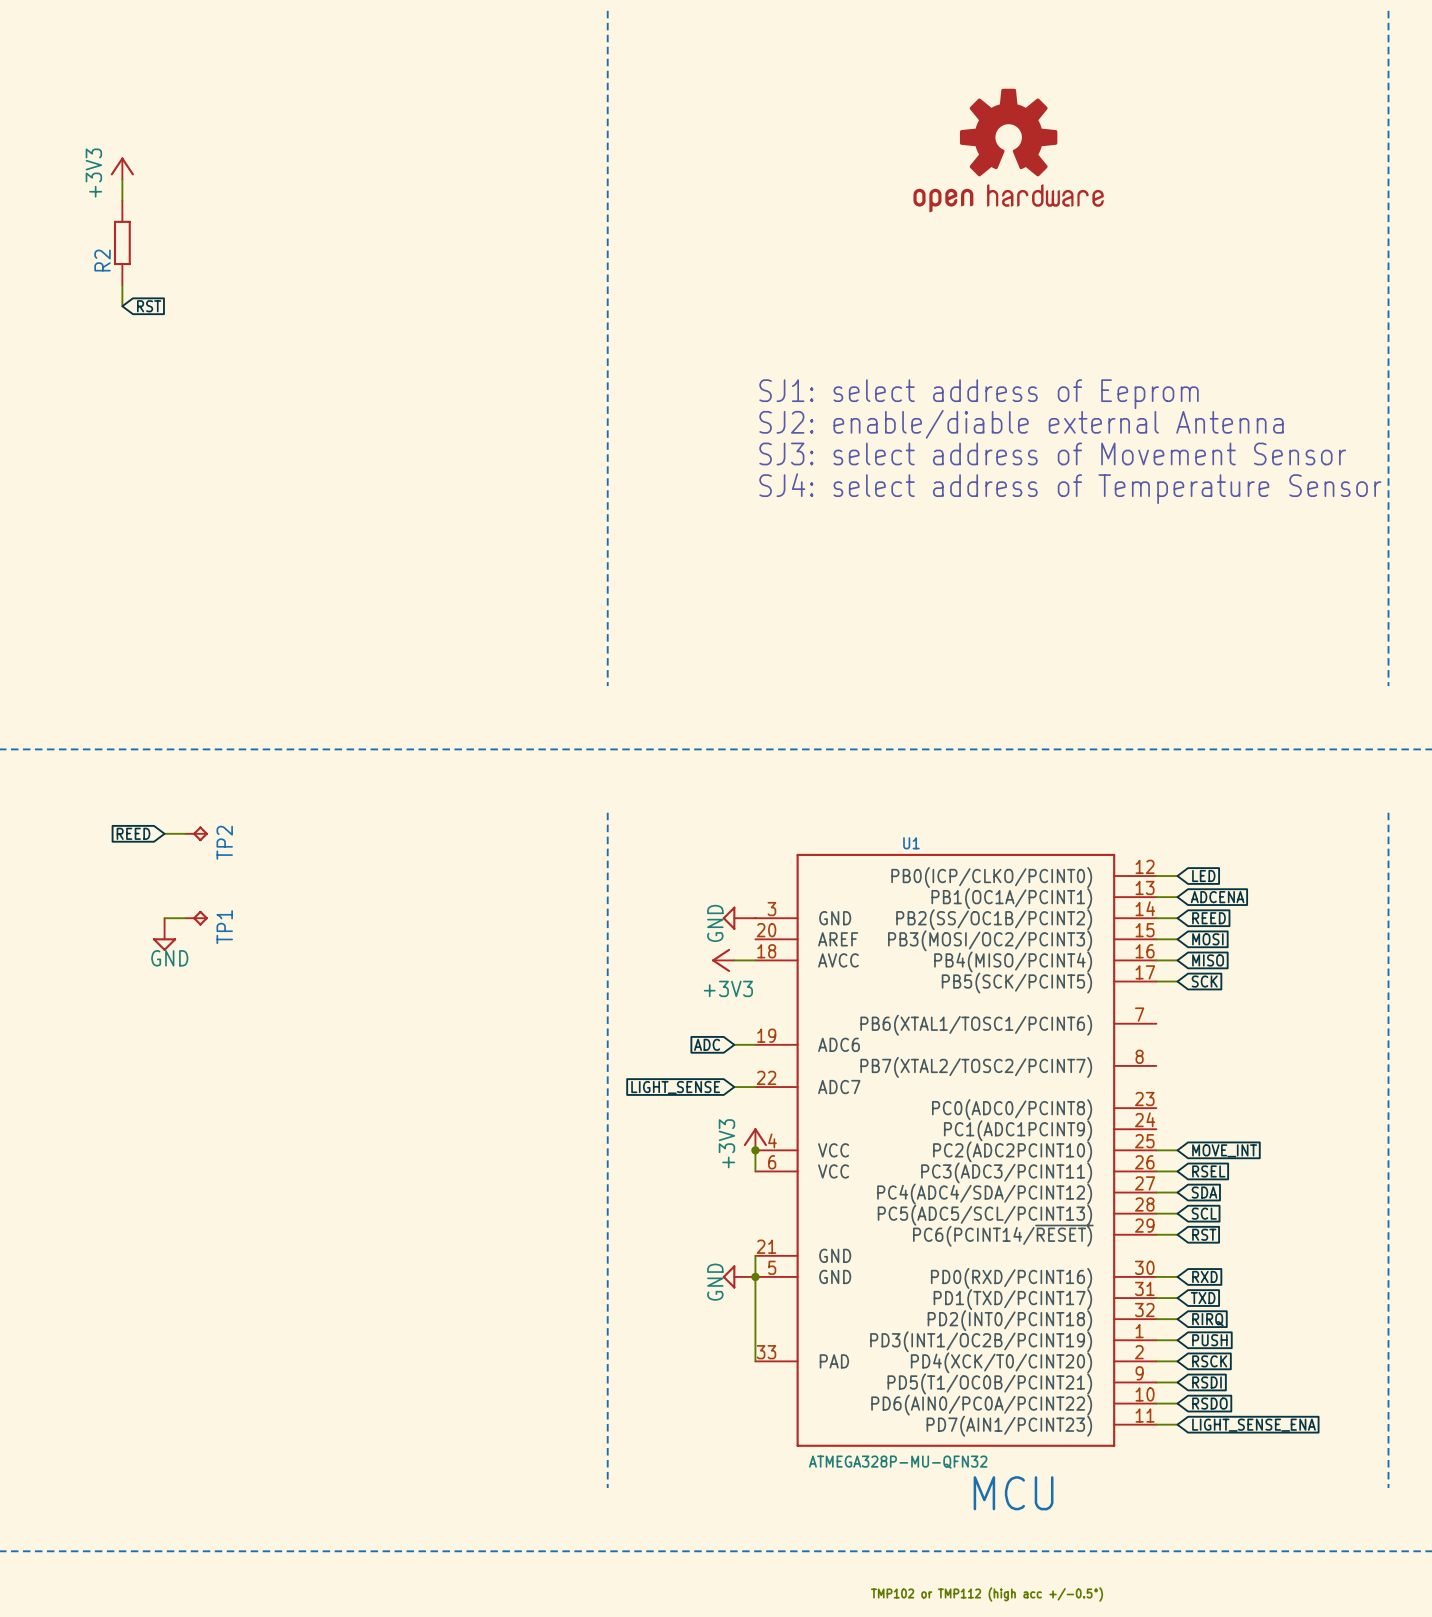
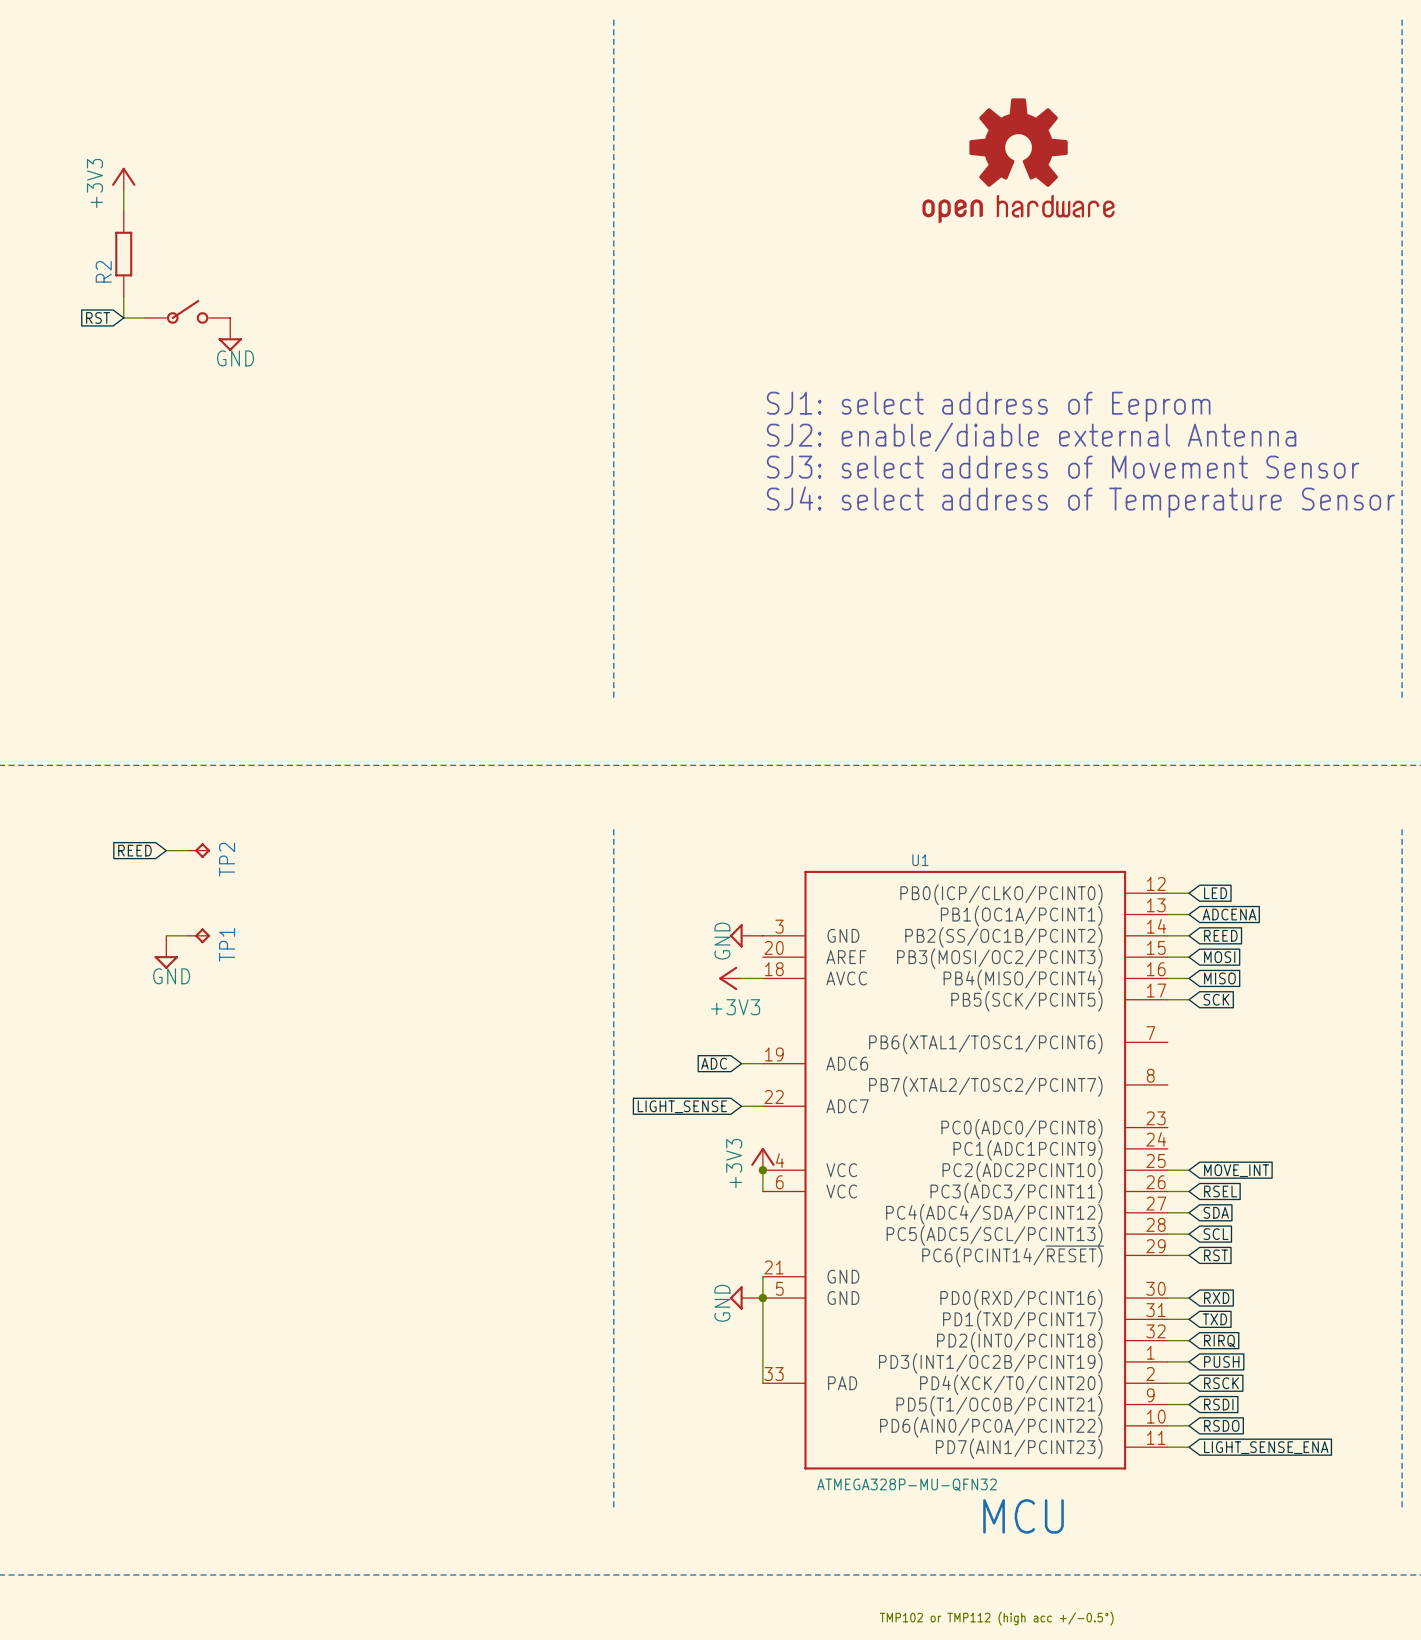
part: none -> (187, 311)
wire: none -> (123, 317) (145, 317)
global label rotation: 0° (149, 306) -> 180° (98, 317)
global label position: RST (149, 306) -> RST (98, 317)
power symbol: none -> GND (230, 334)

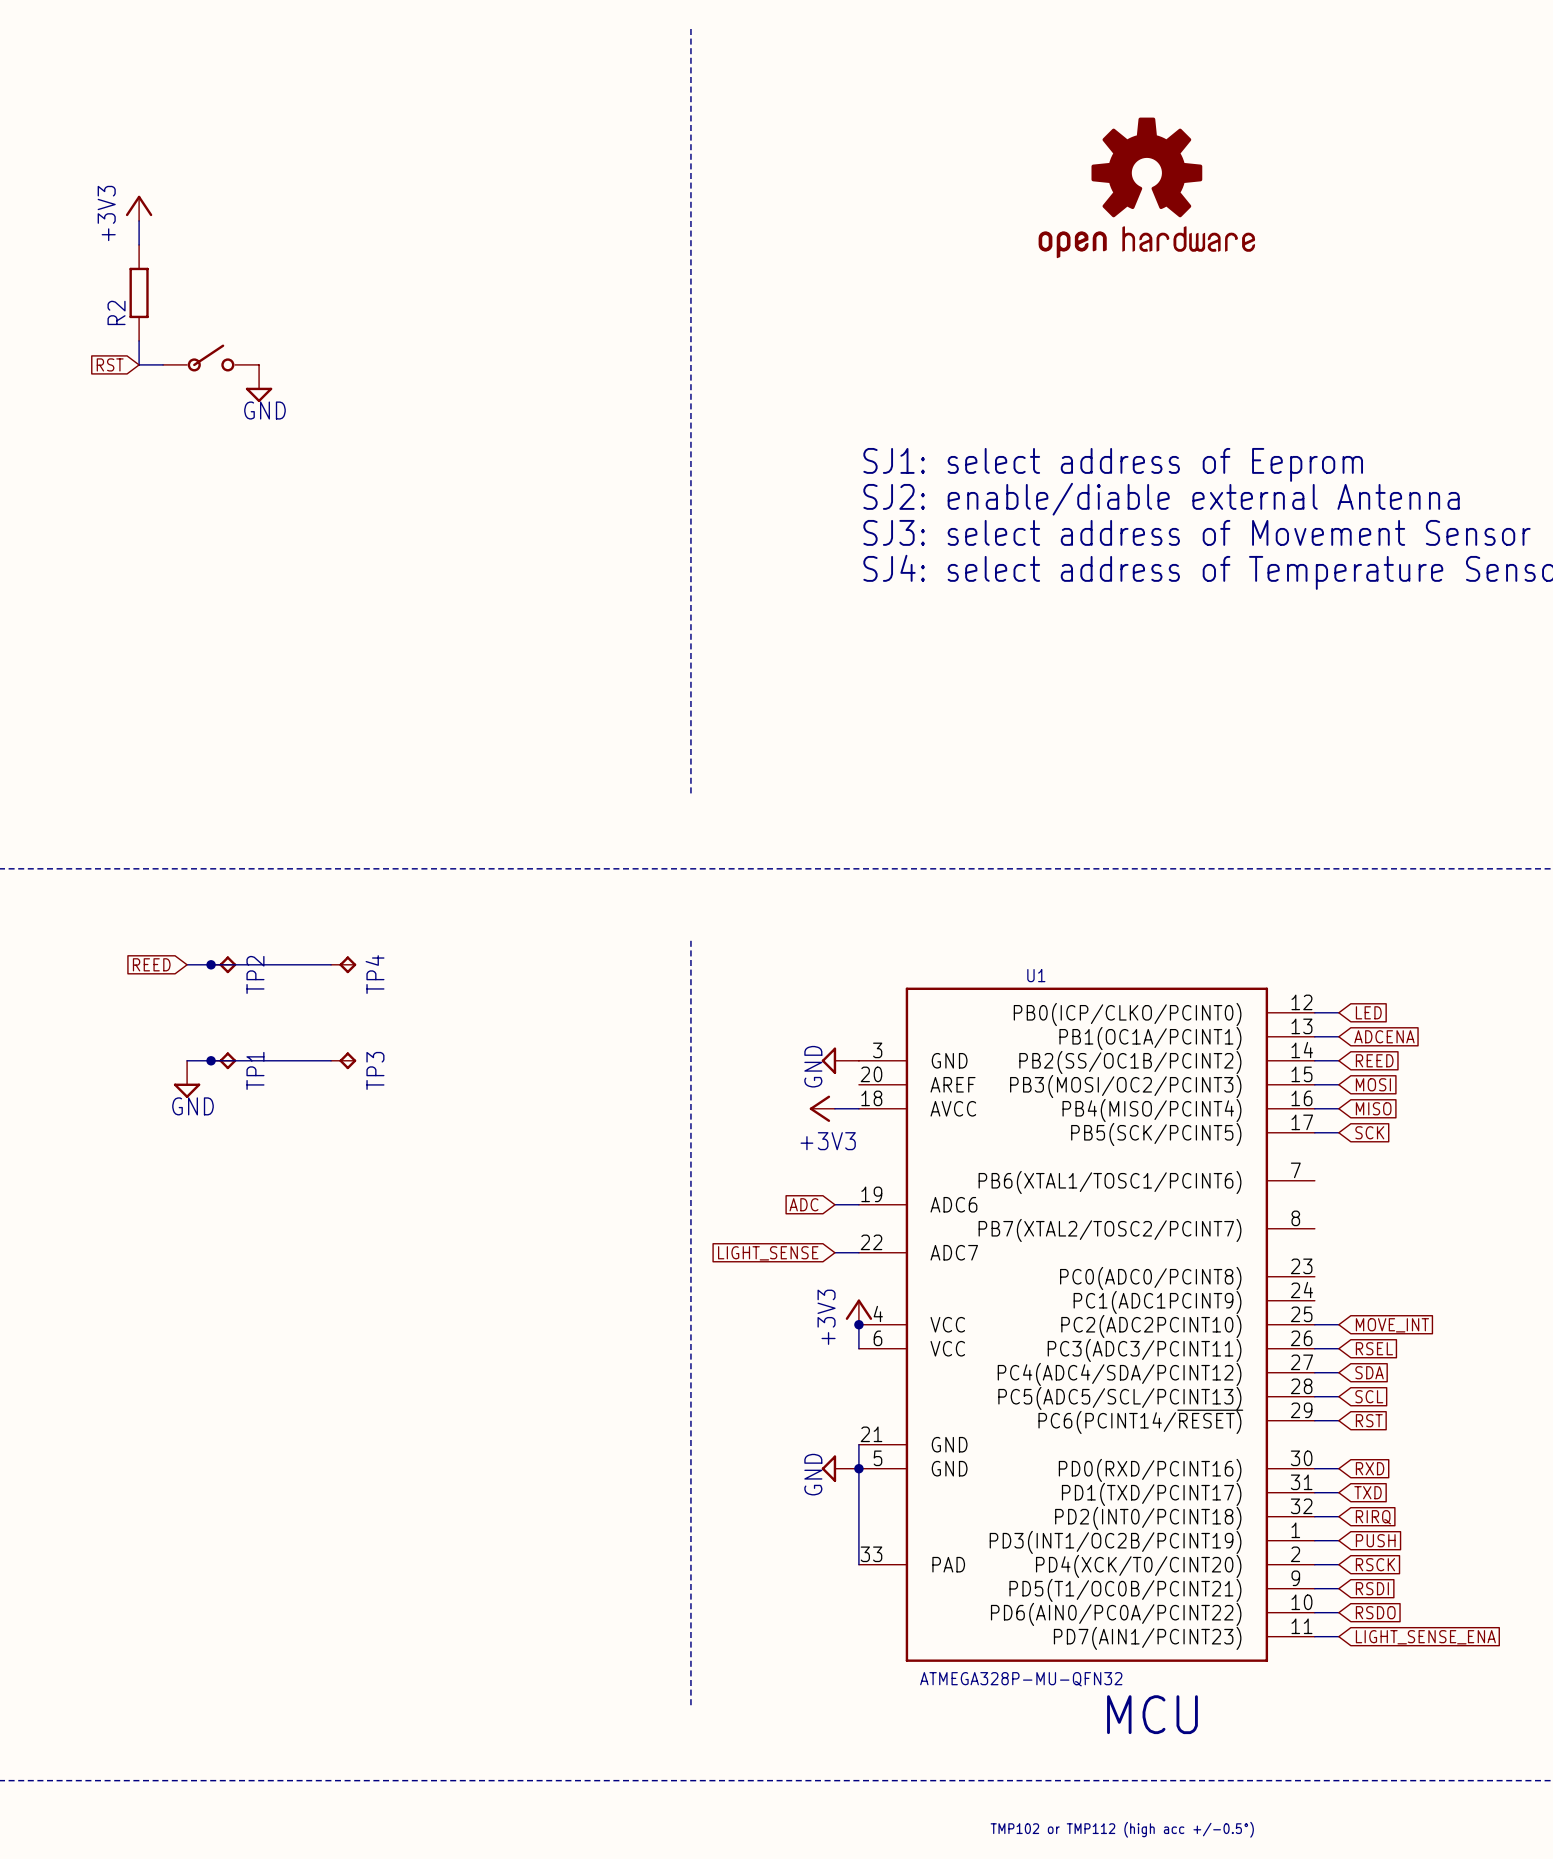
wire: none -> (211, 964) (331, 964)
junction: none -> (211, 964)
TP4: none -> (343, 964)
wire: none -> (211, 1060) (331, 1060)
junction: none -> (211, 1060)
TP3: none -> (343, 1060)

